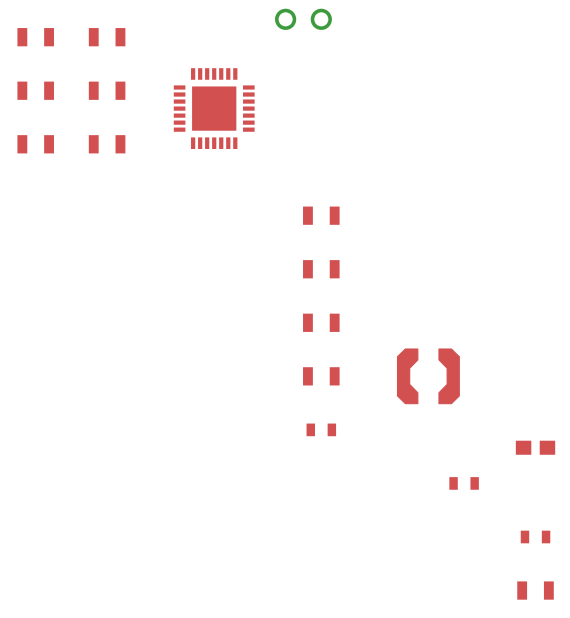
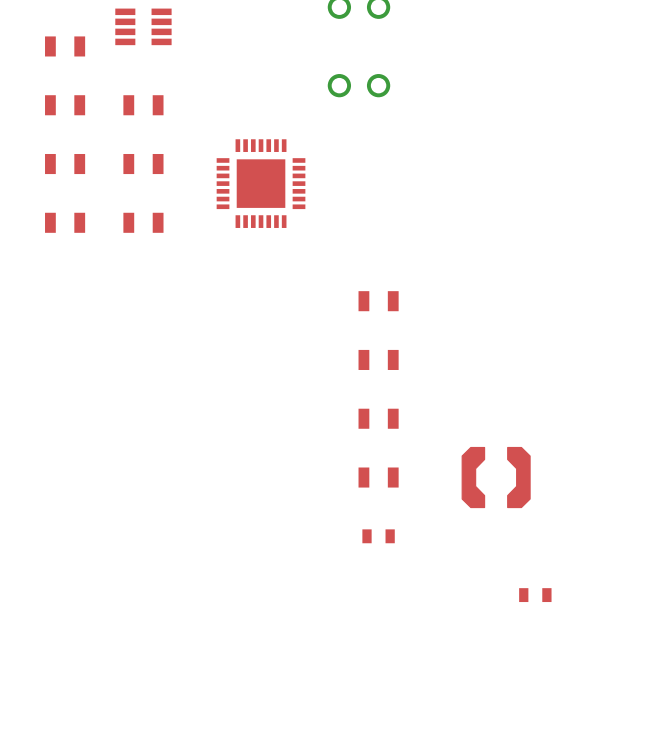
part: (535, 447) -> none
part: (535, 536) -> none
part: (535, 590) -> none

